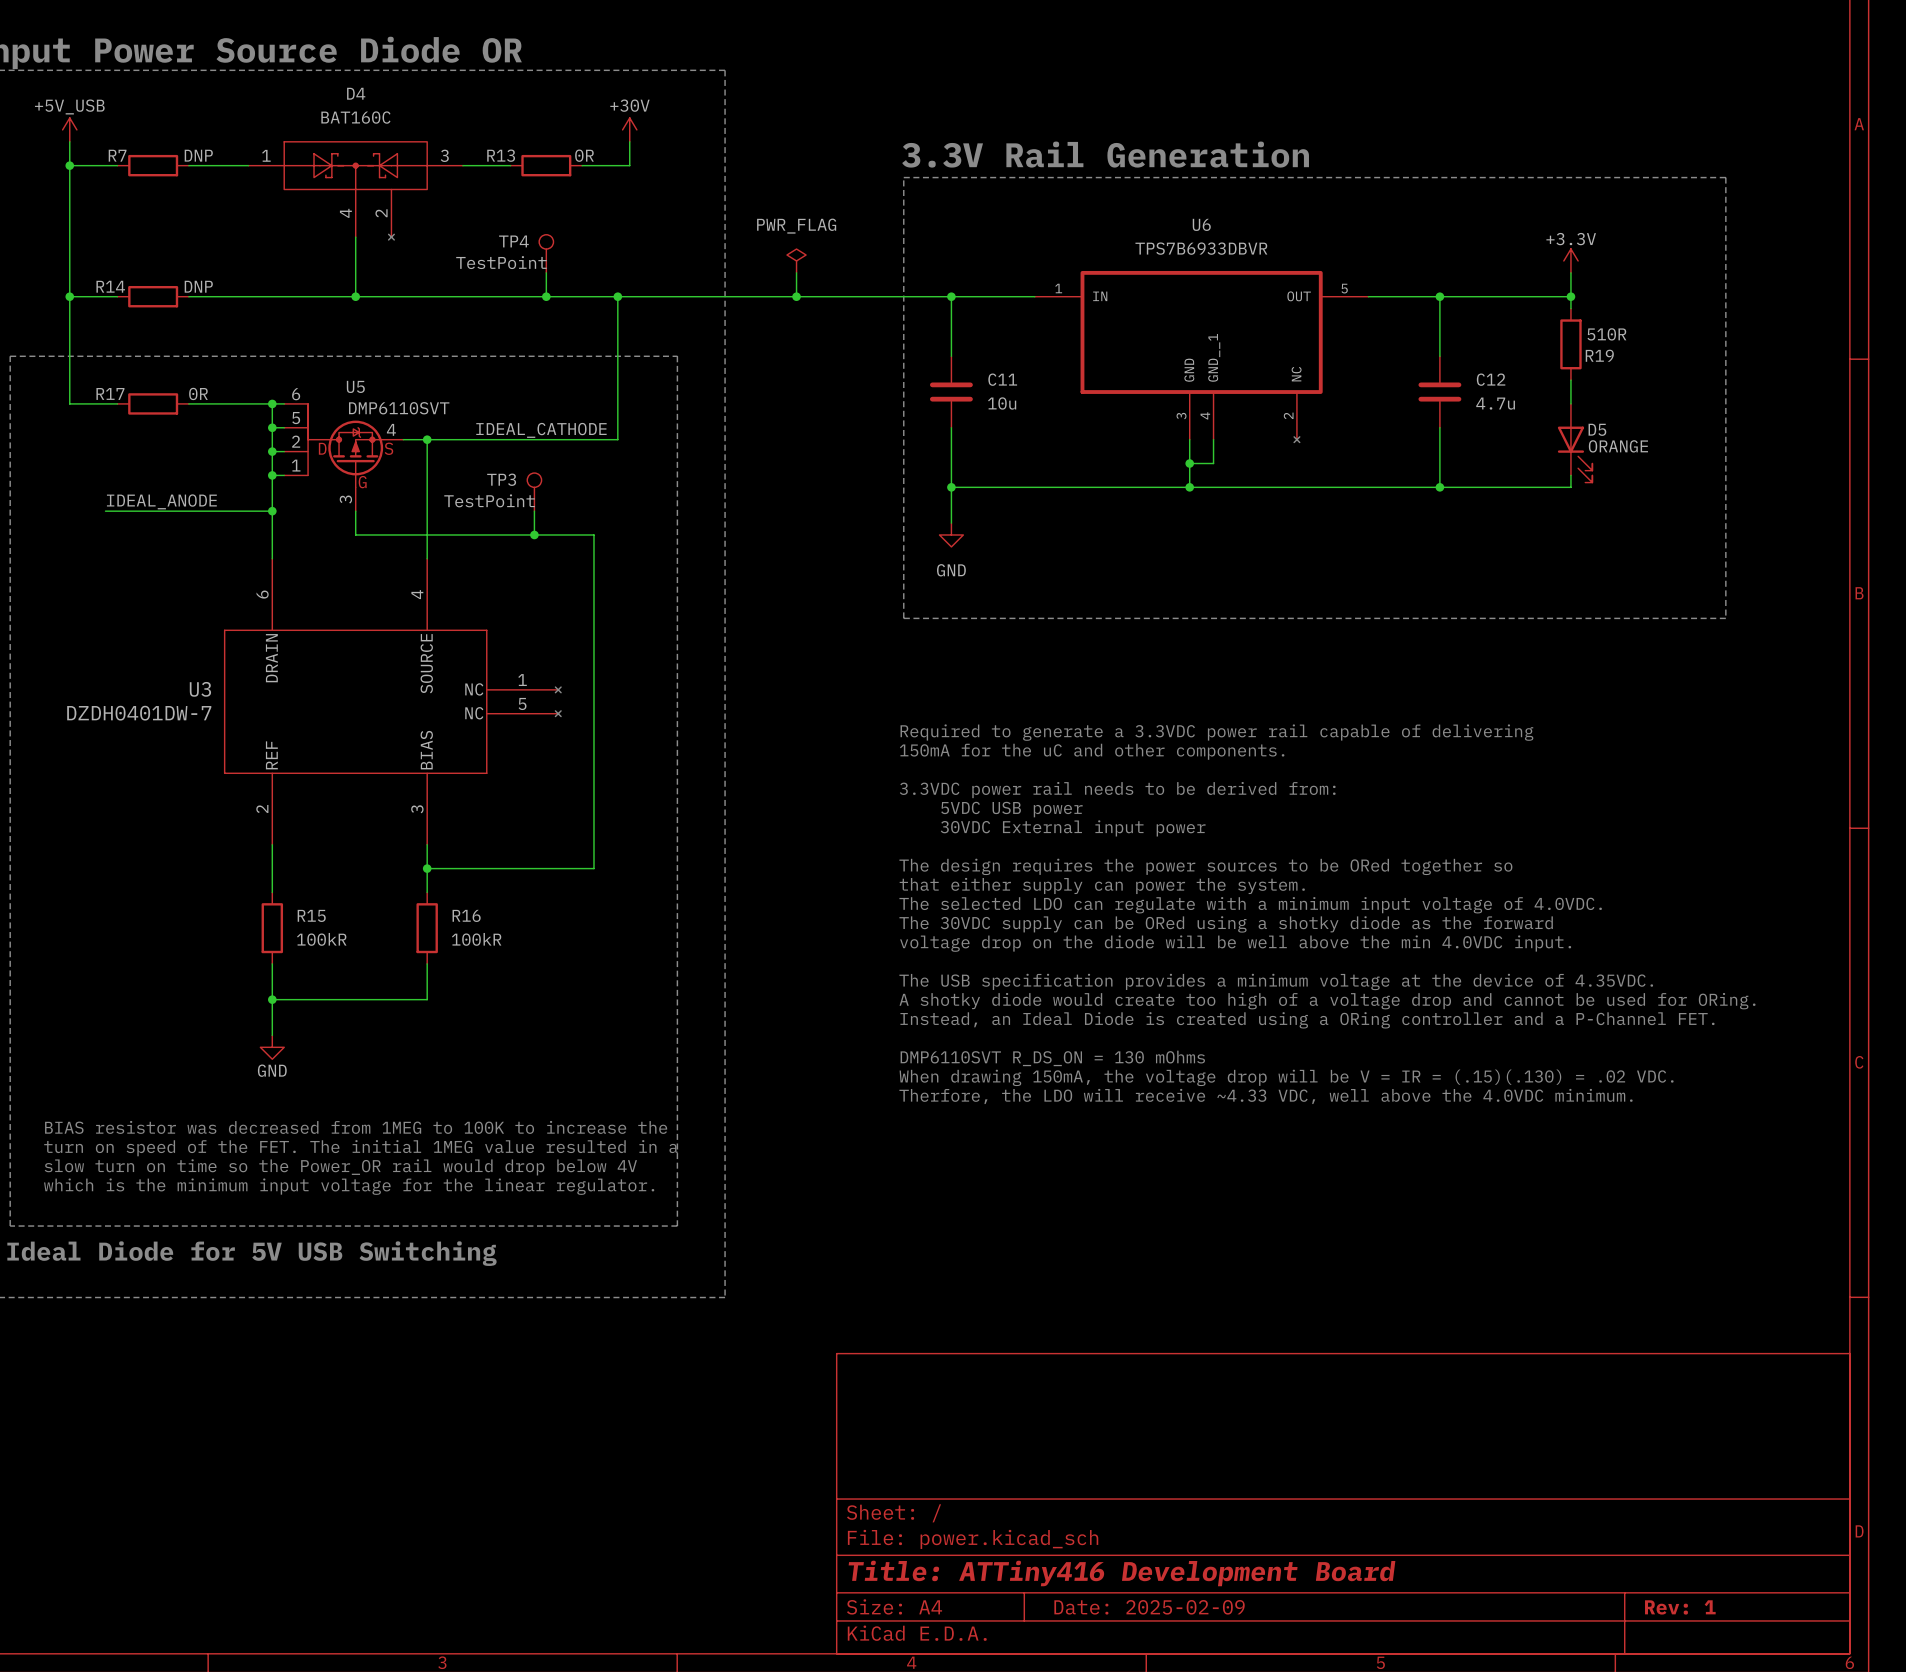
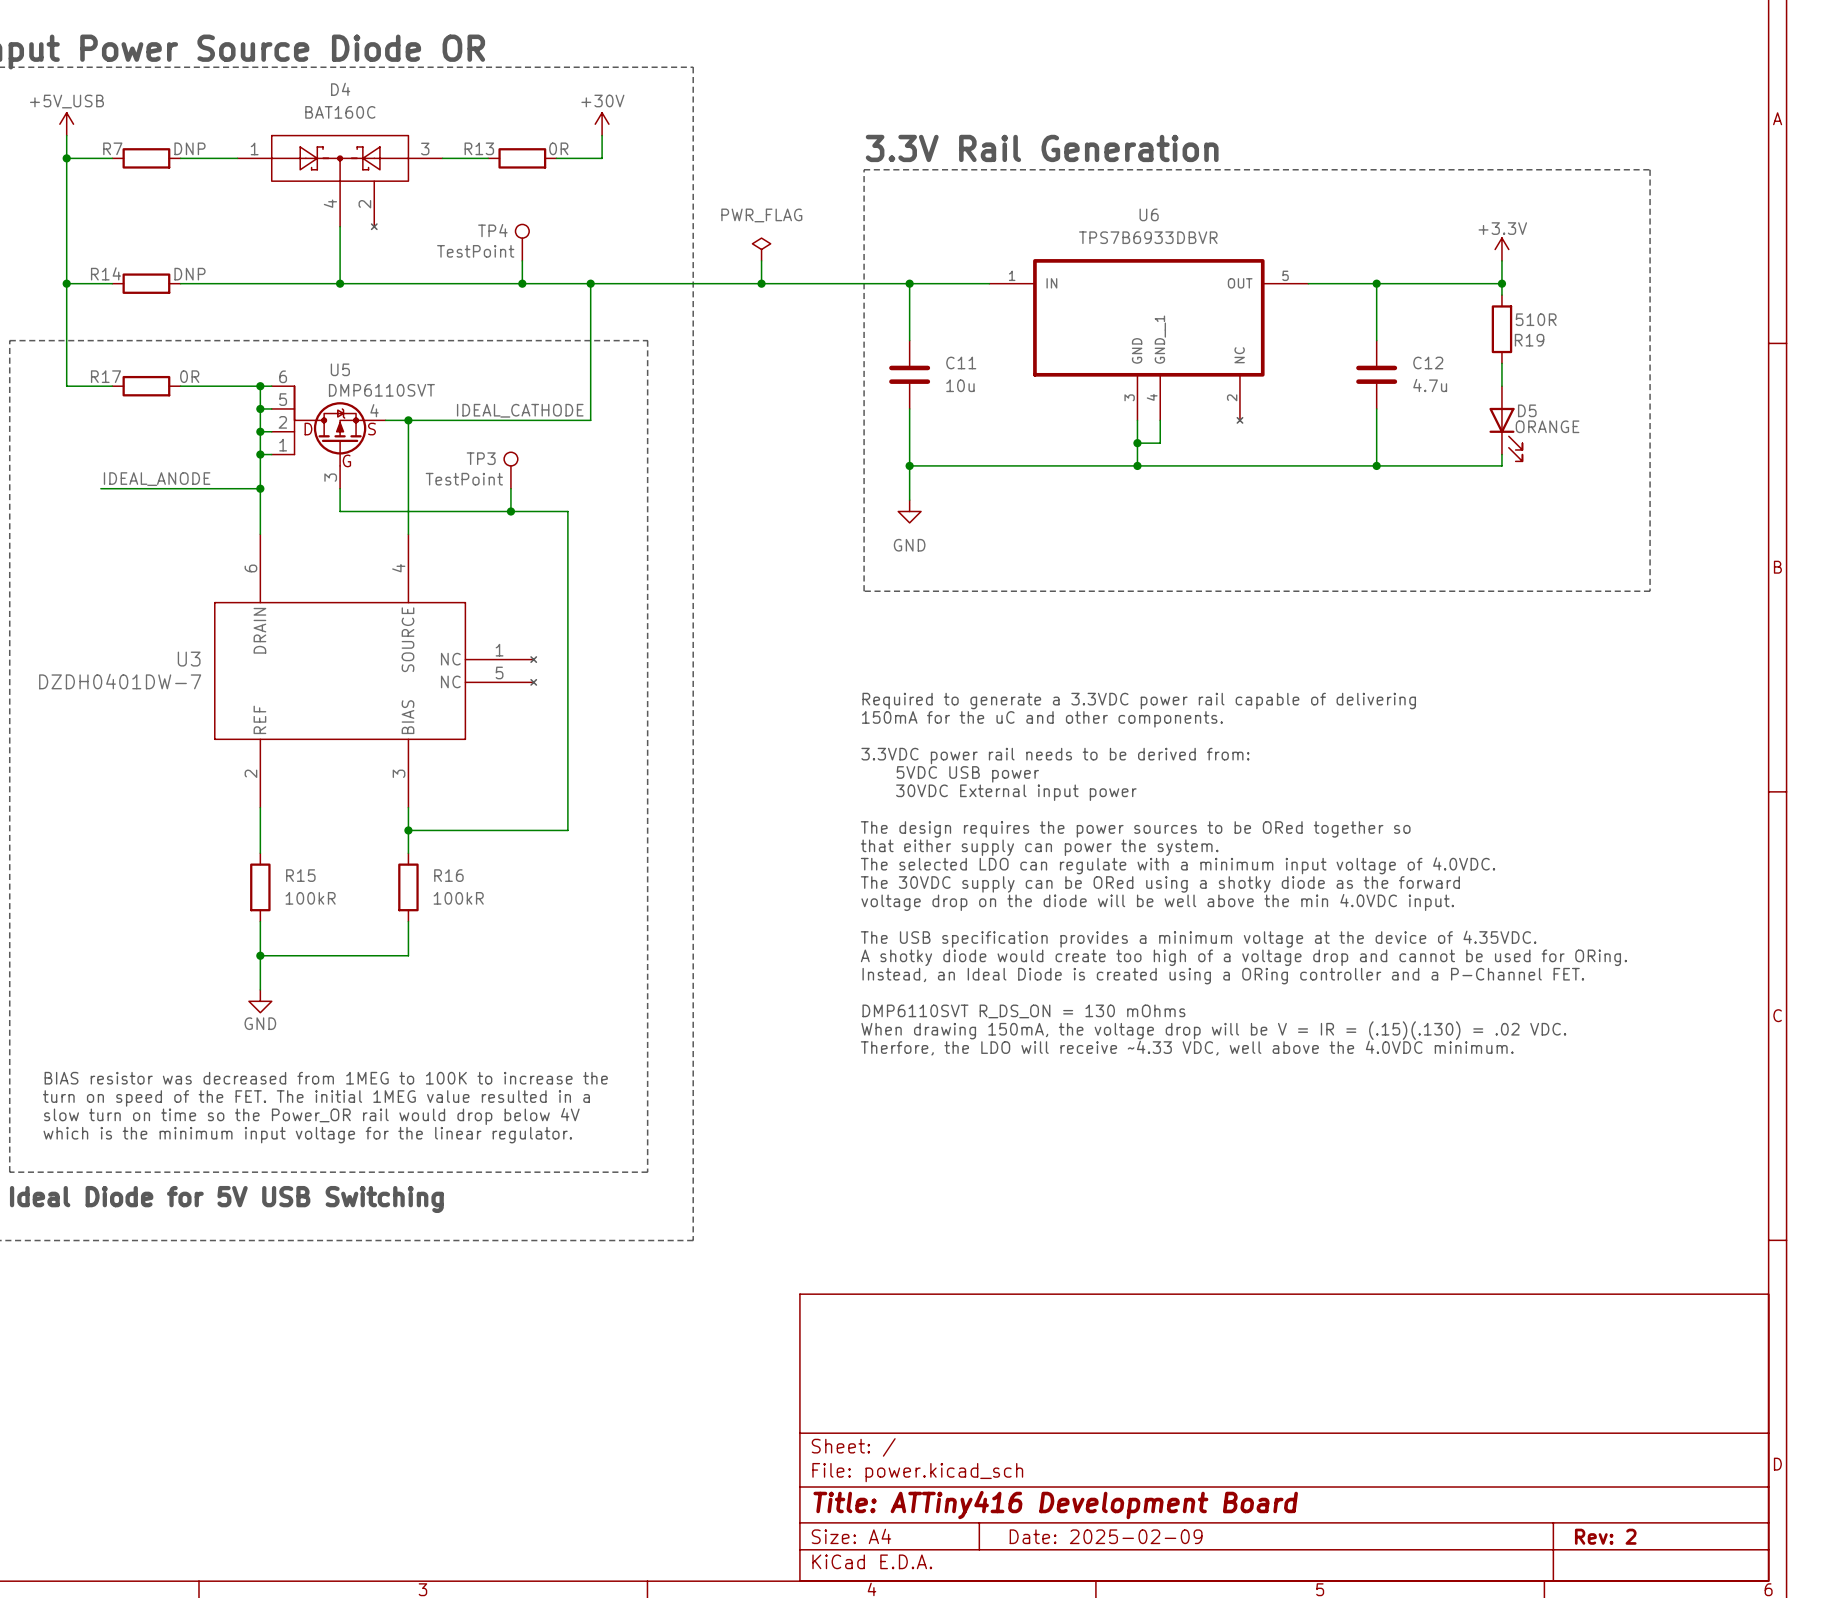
title block: Rev: 1 (1680, 1607) -> Rev: 2 (1605, 1536)

